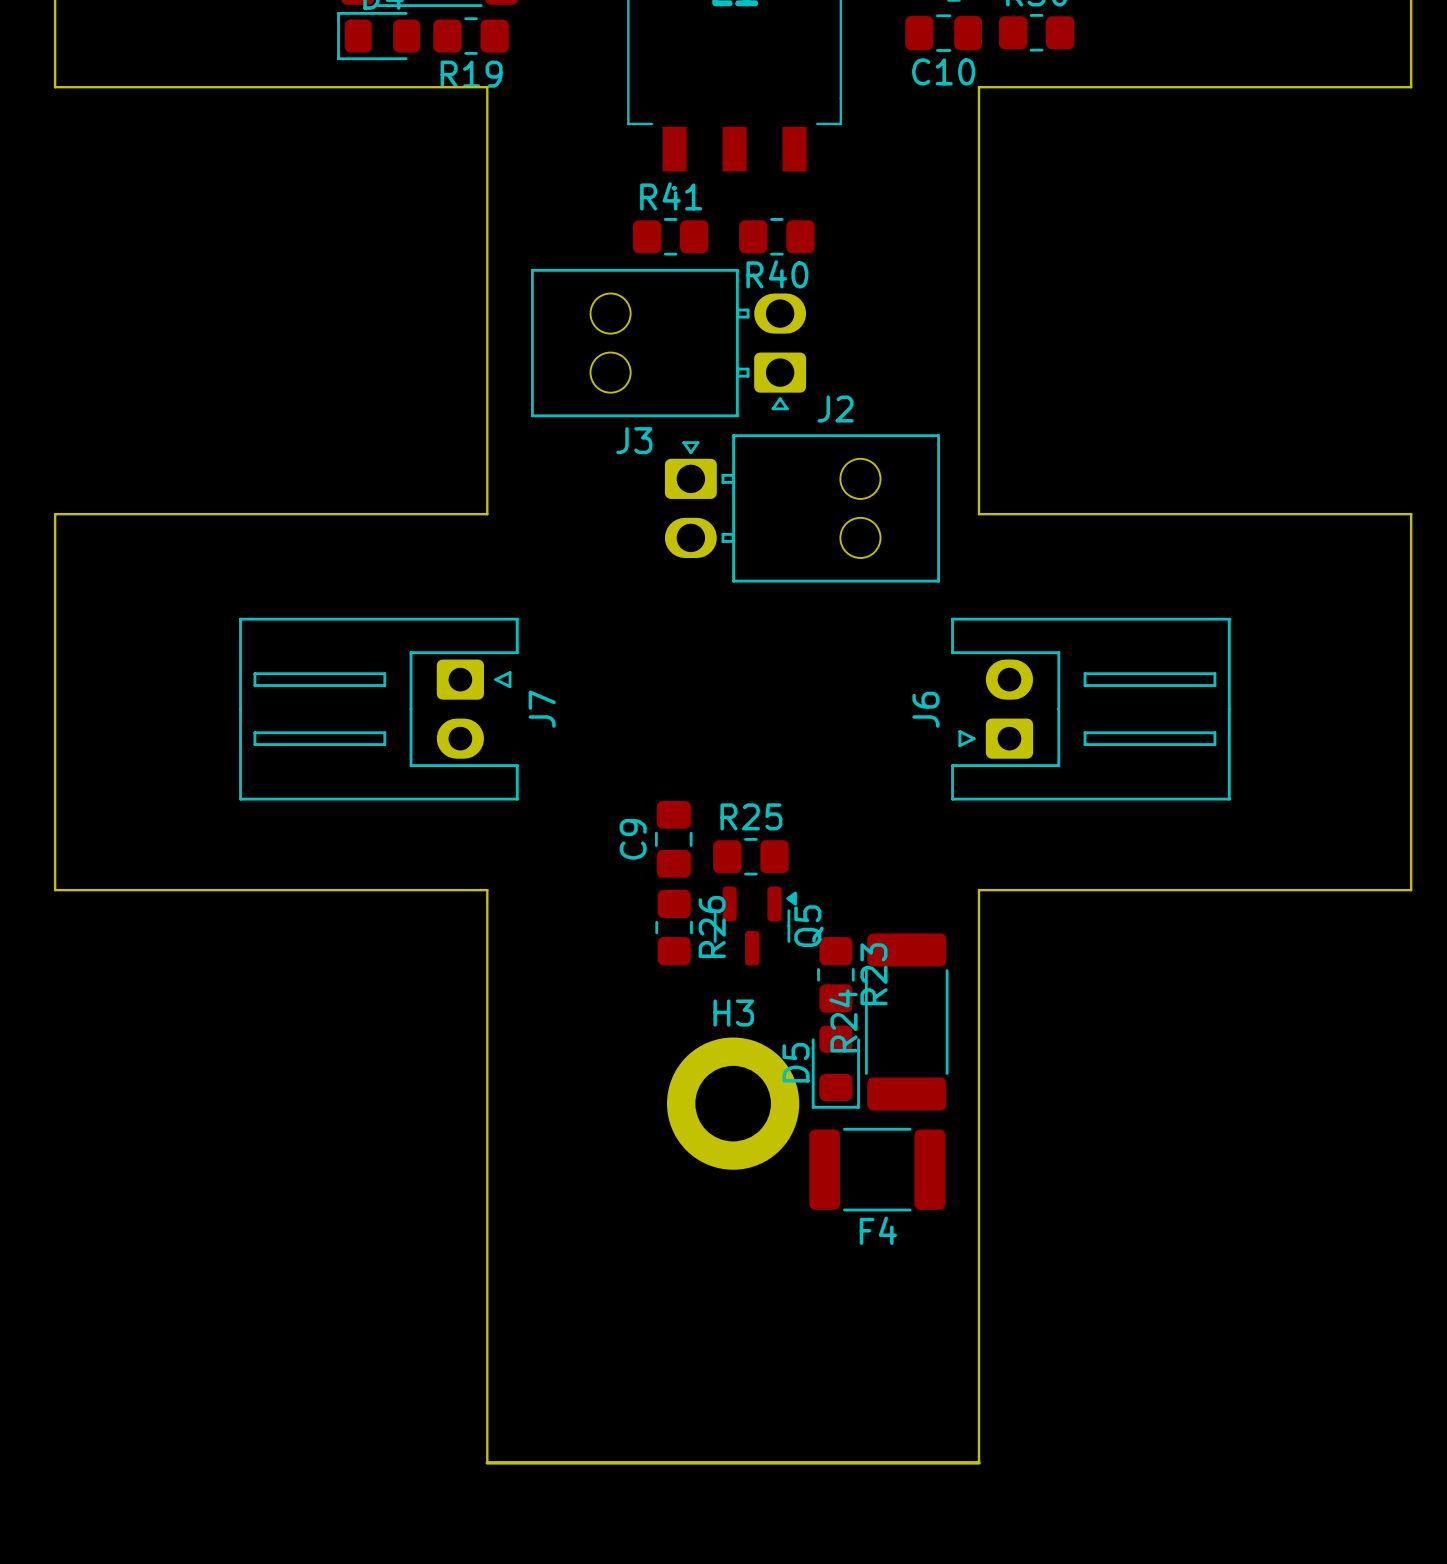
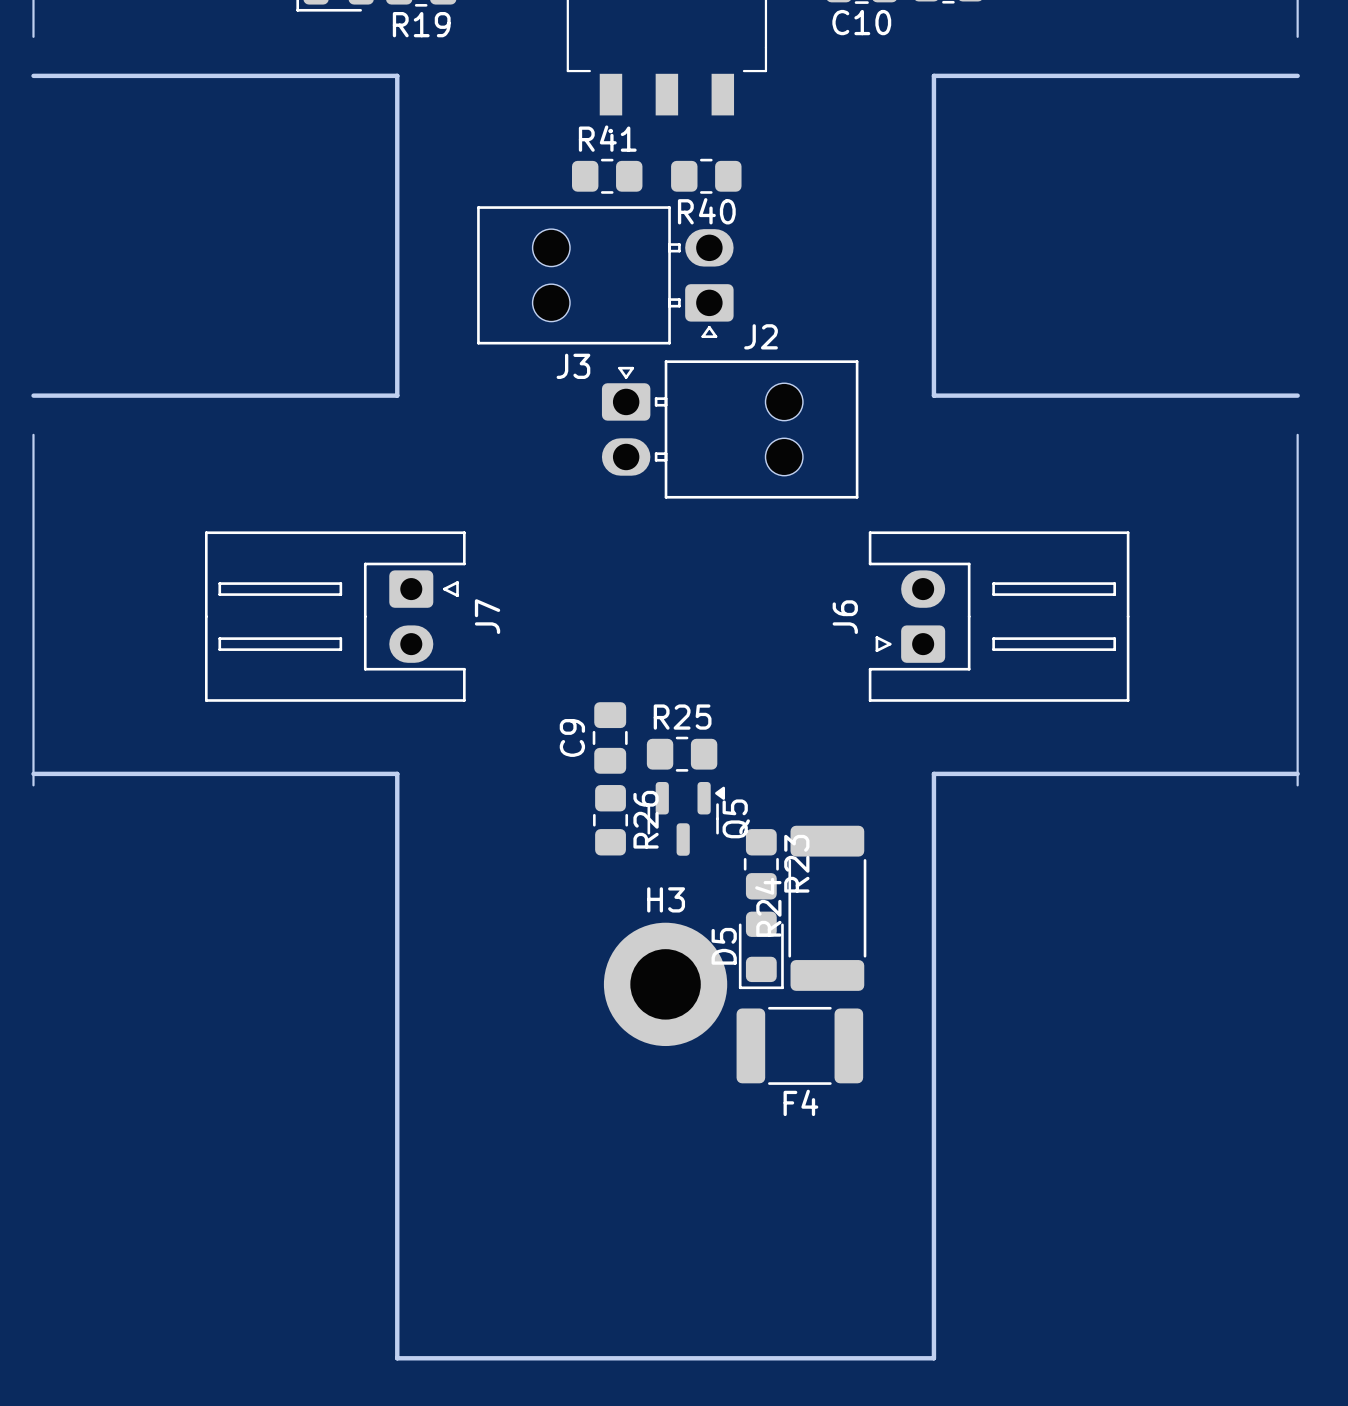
board edge: (55, 87) (487, 87) (487, 514) (55, 514) -> none
board edge: (1411, 87) (978, 87) (978, 514) (1411, 514) -> none
board edge: none -> (33, 75) (397, 75) (397, 395) (33, 395)
board edge: none -> (1297, 75) (933, 75) (933, 395) (1297, 395)
board edge: none -> (33, 773) (397, 773) (397, 1358) (933, 1358) (933, 773) (1297, 773)
board edge: (55, 890) (487, 890) (487, 1462) (978, 1462) (978, 890) (1411, 890) -> none

